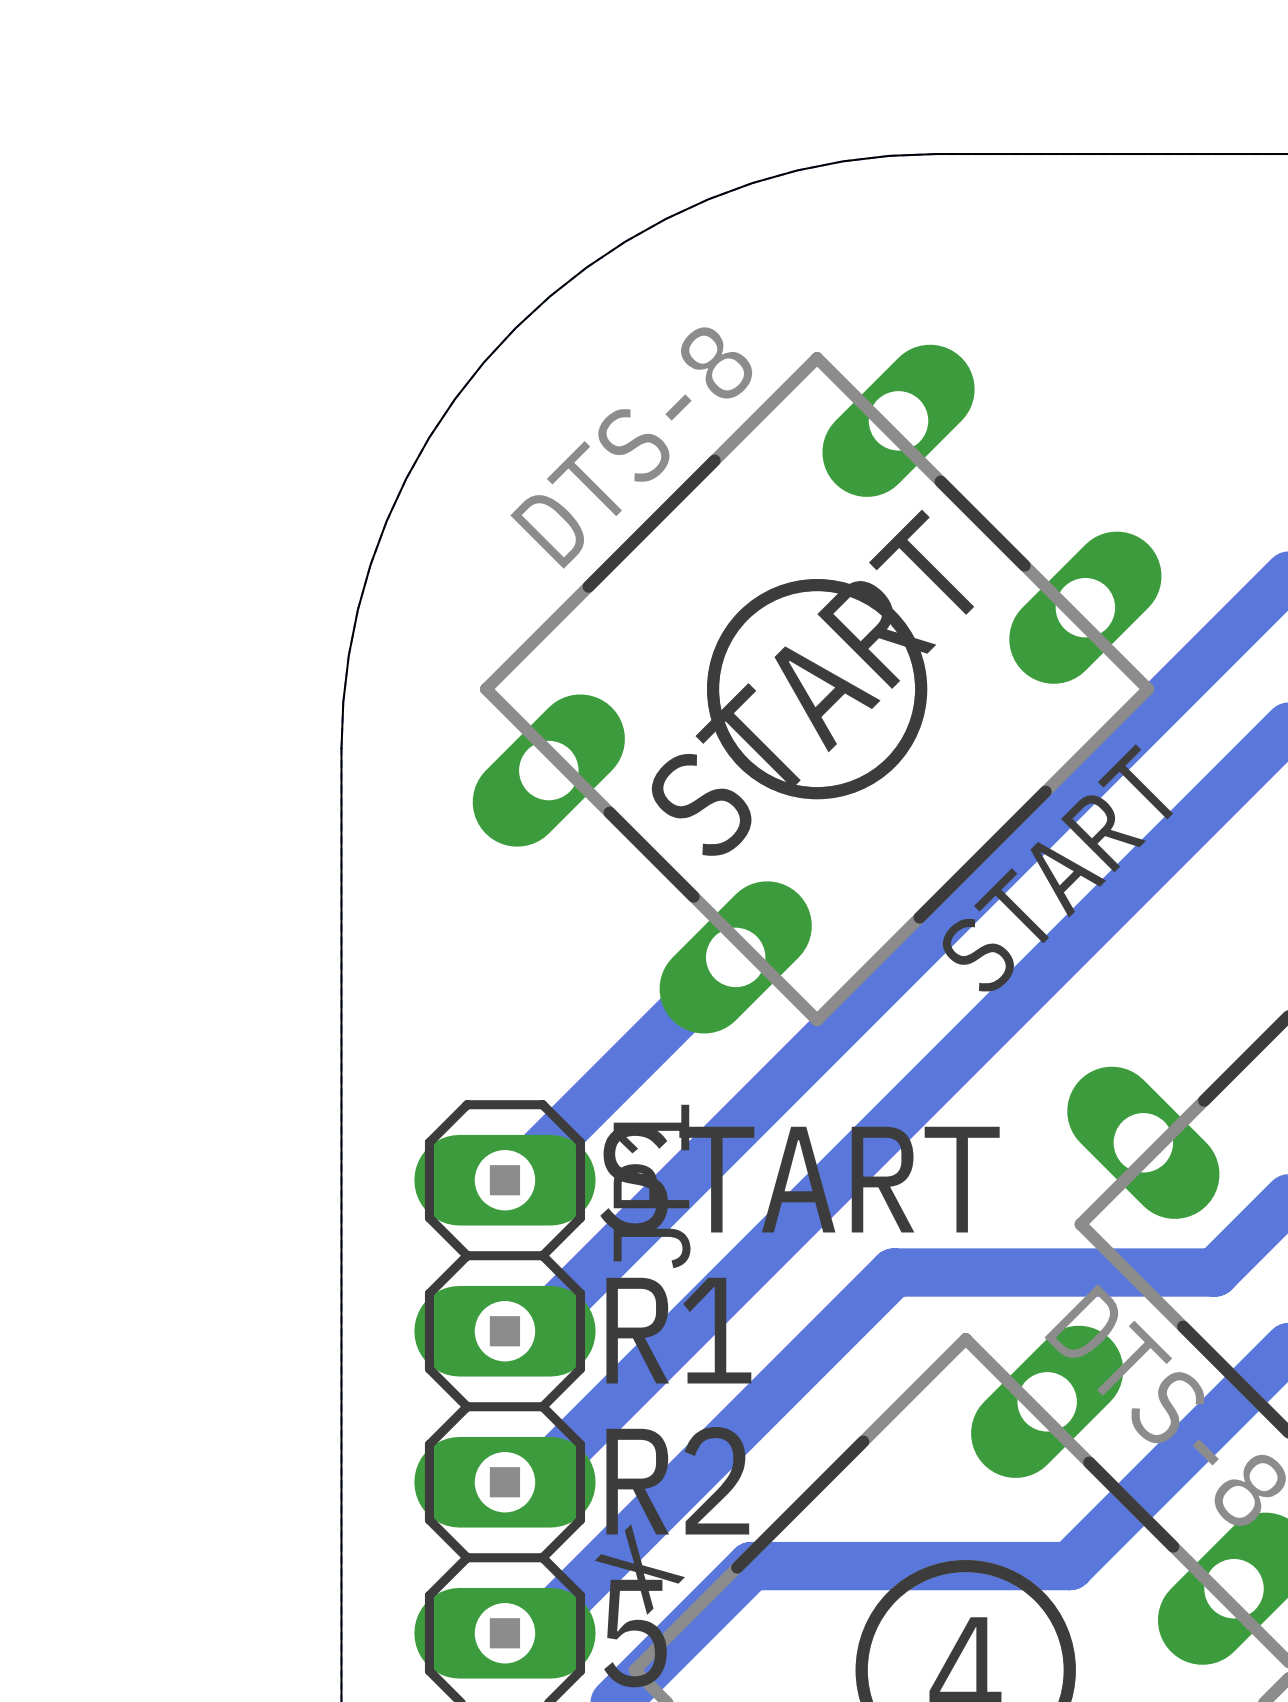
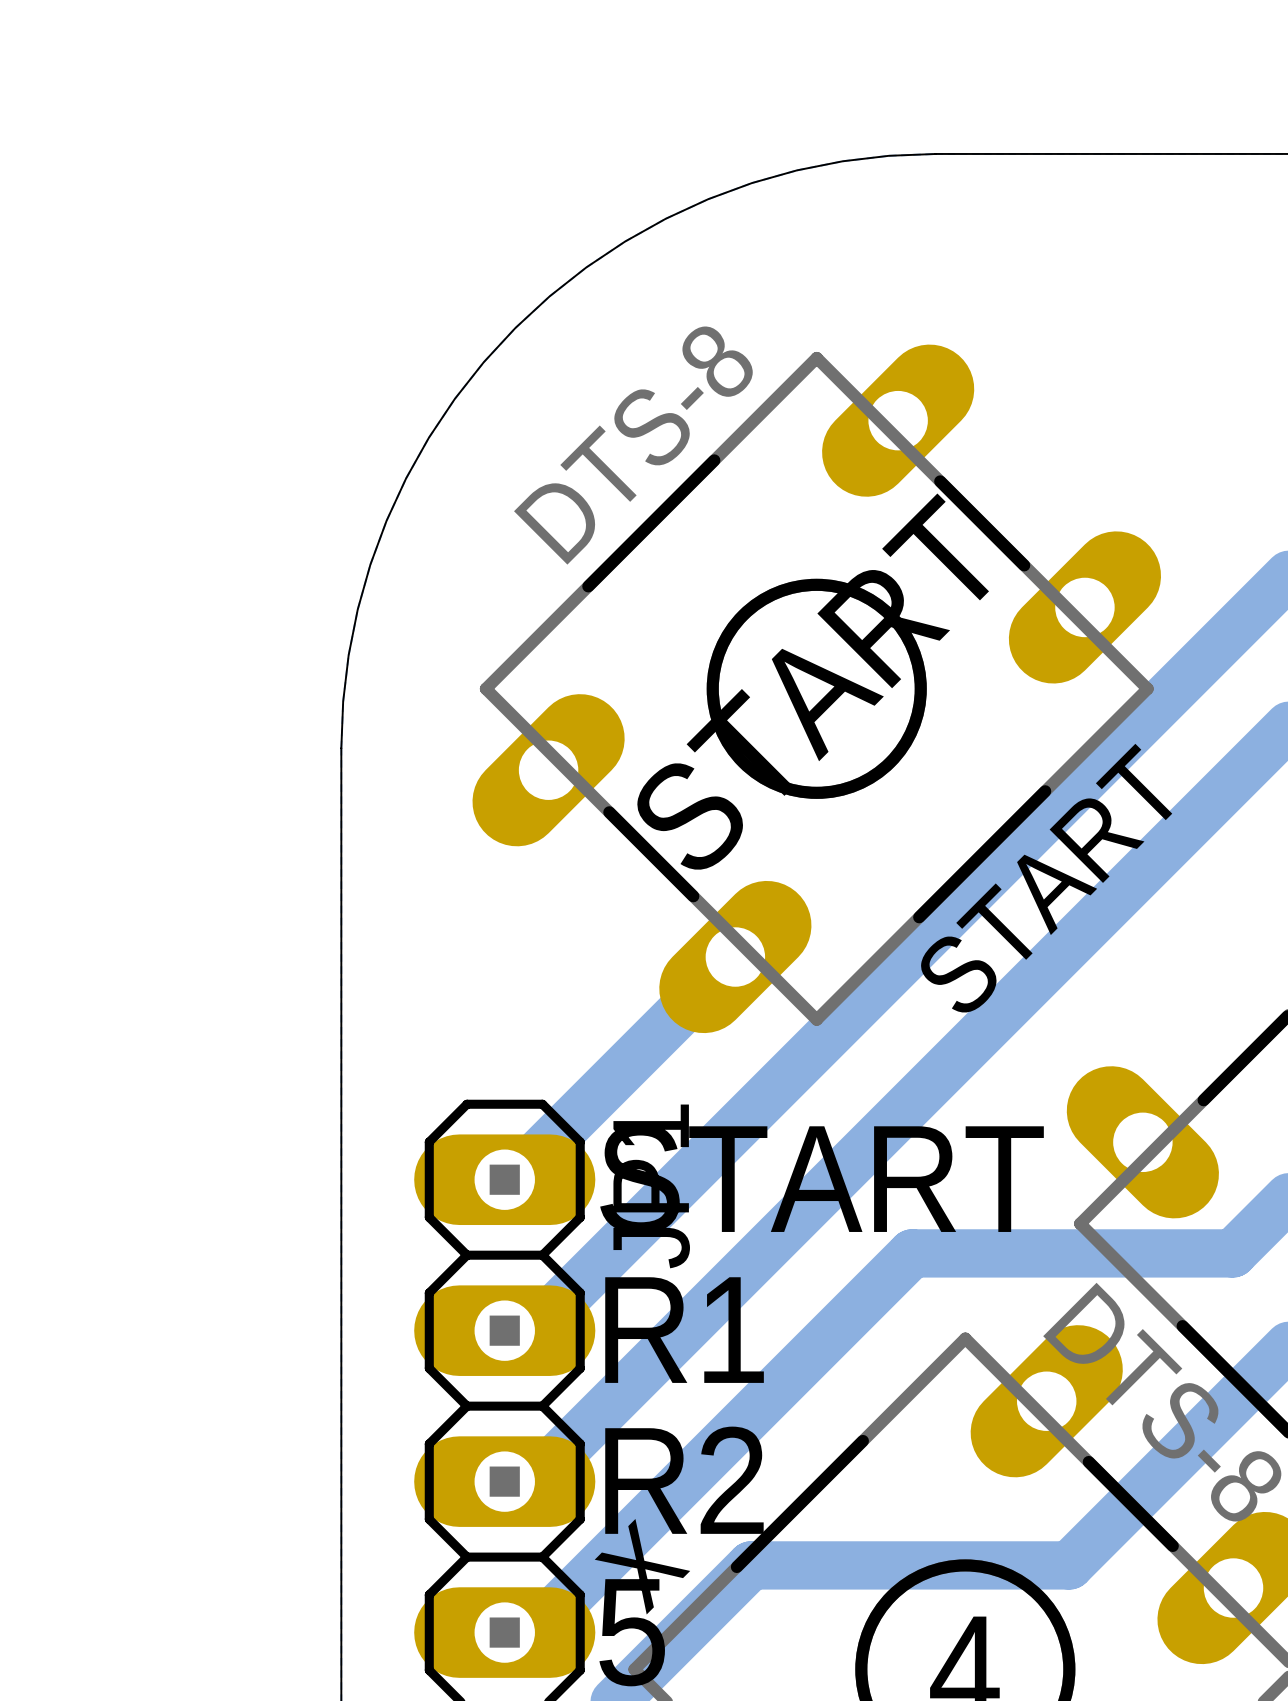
bottom track: (1233, 1253) (1214, 1272) (894, 1272) -> (1232, 1253) (912, 1253) (893, 1271)

